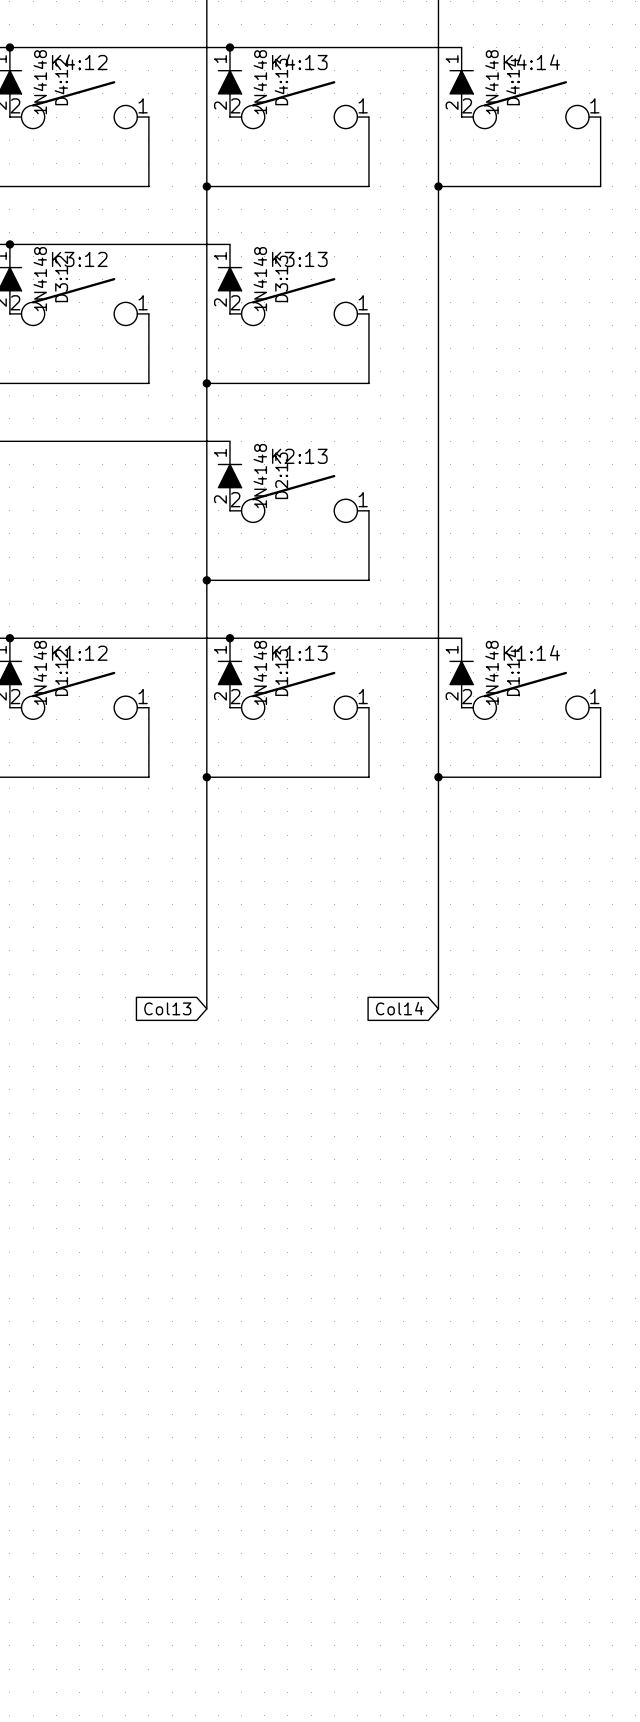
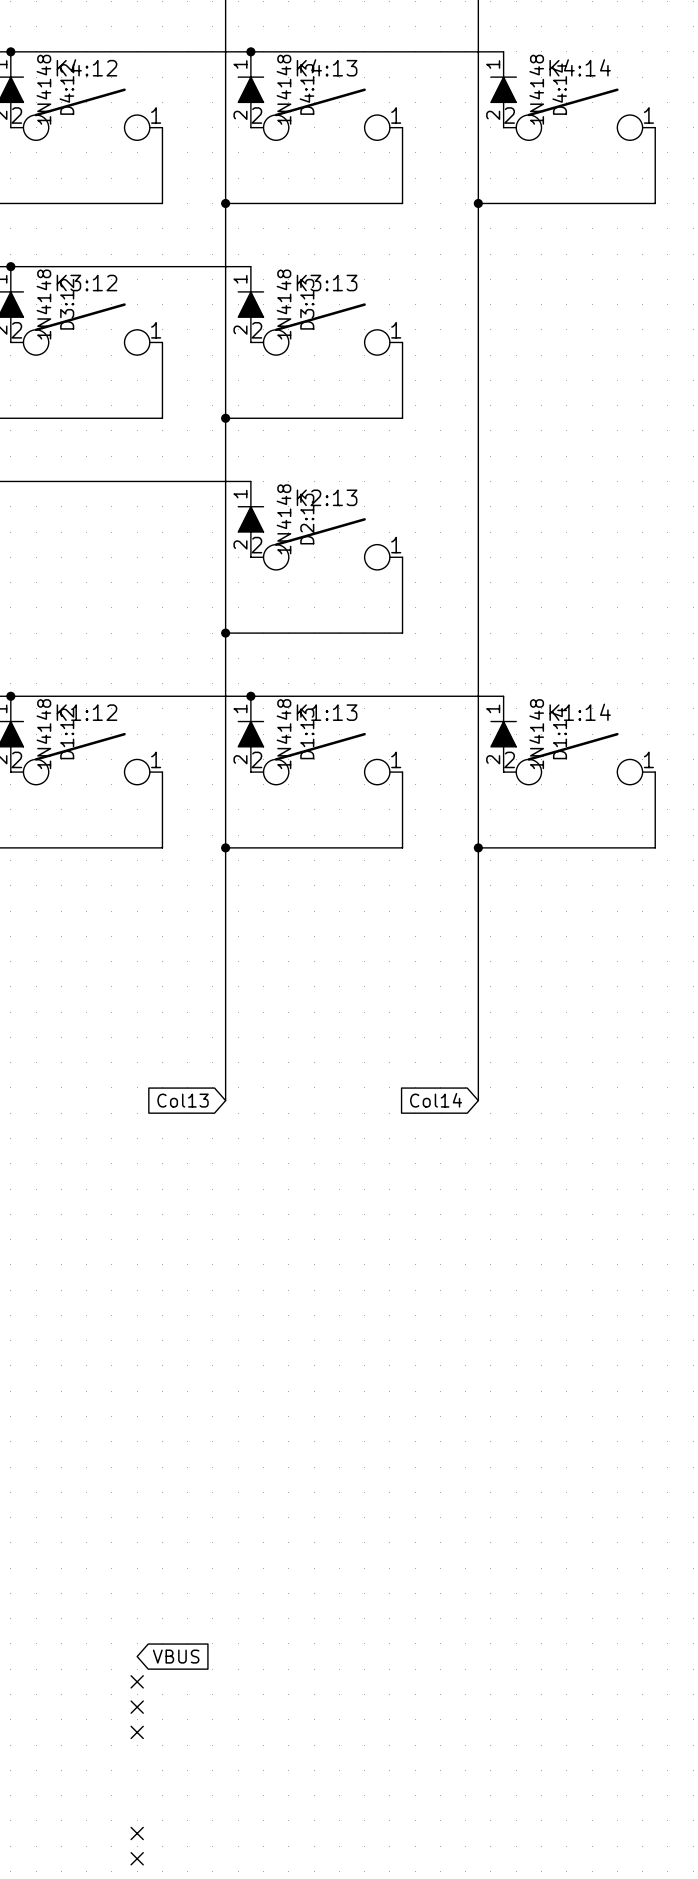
global label: none -> VBUS (176, 1656)
no-connect mark: none -> (137, 1681)
no-connect mark: none -> (137, 1707)
no-connect mark: none -> (137, 1732)
no-connect mark: none -> (137, 1833)
no-connect mark: none -> (137, 1858)

